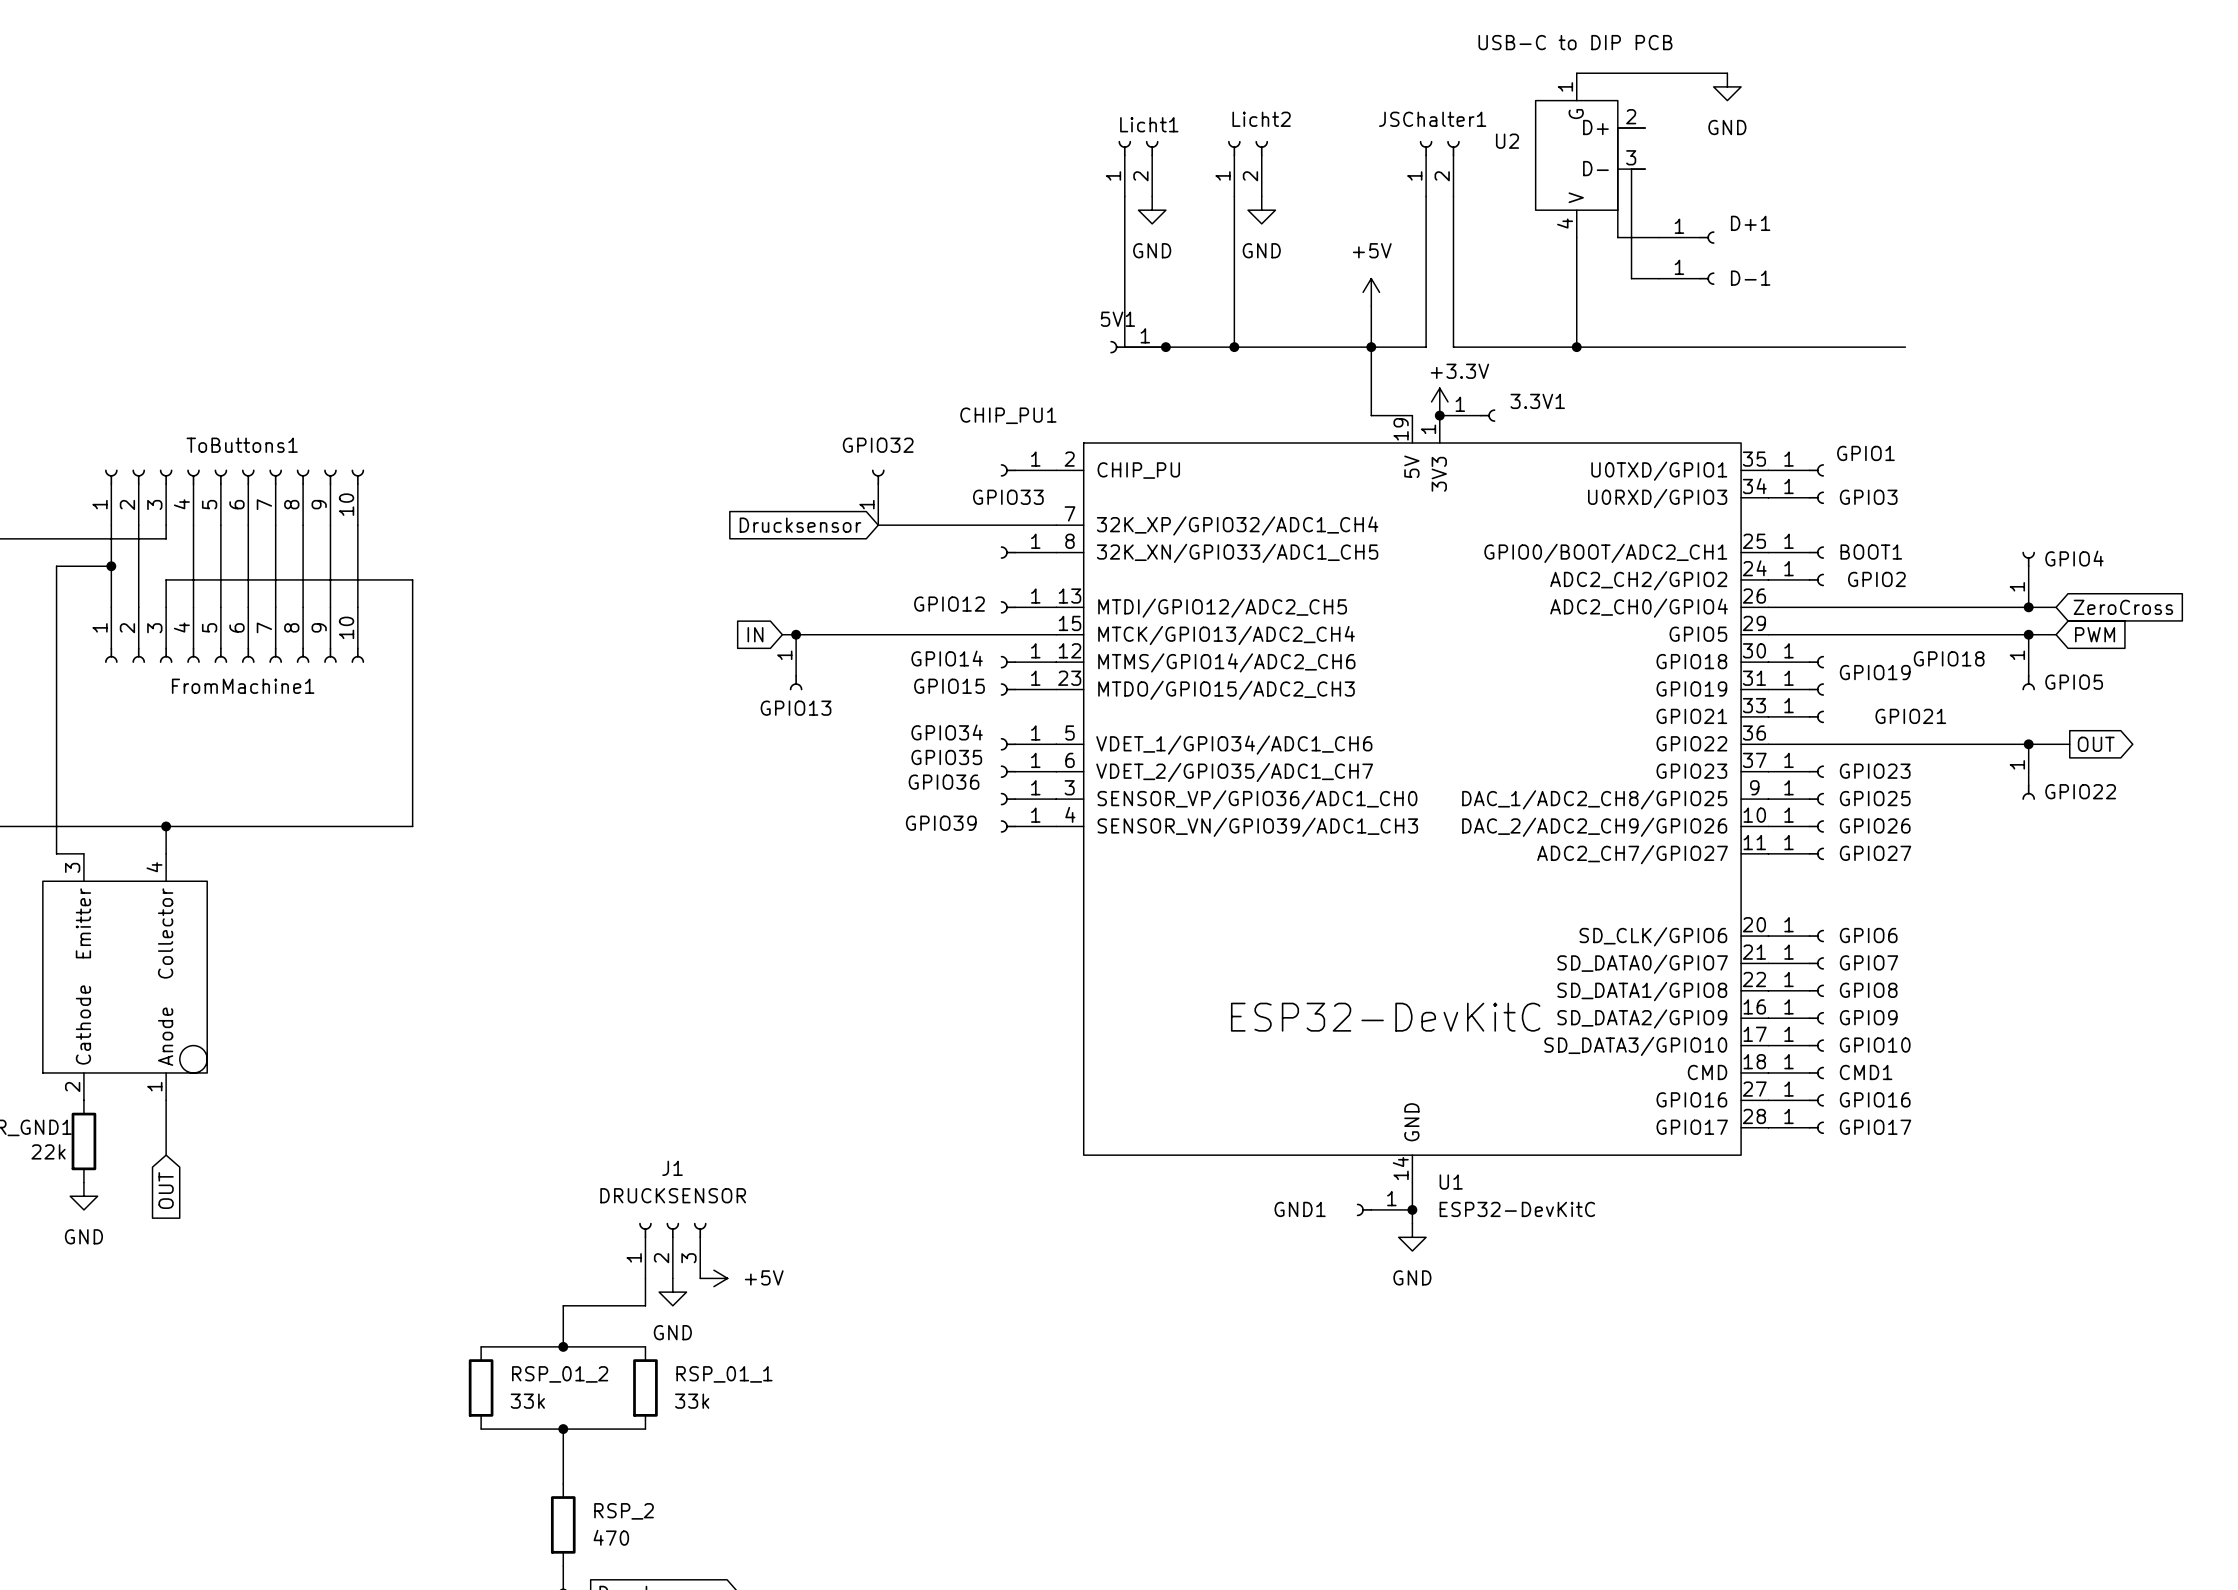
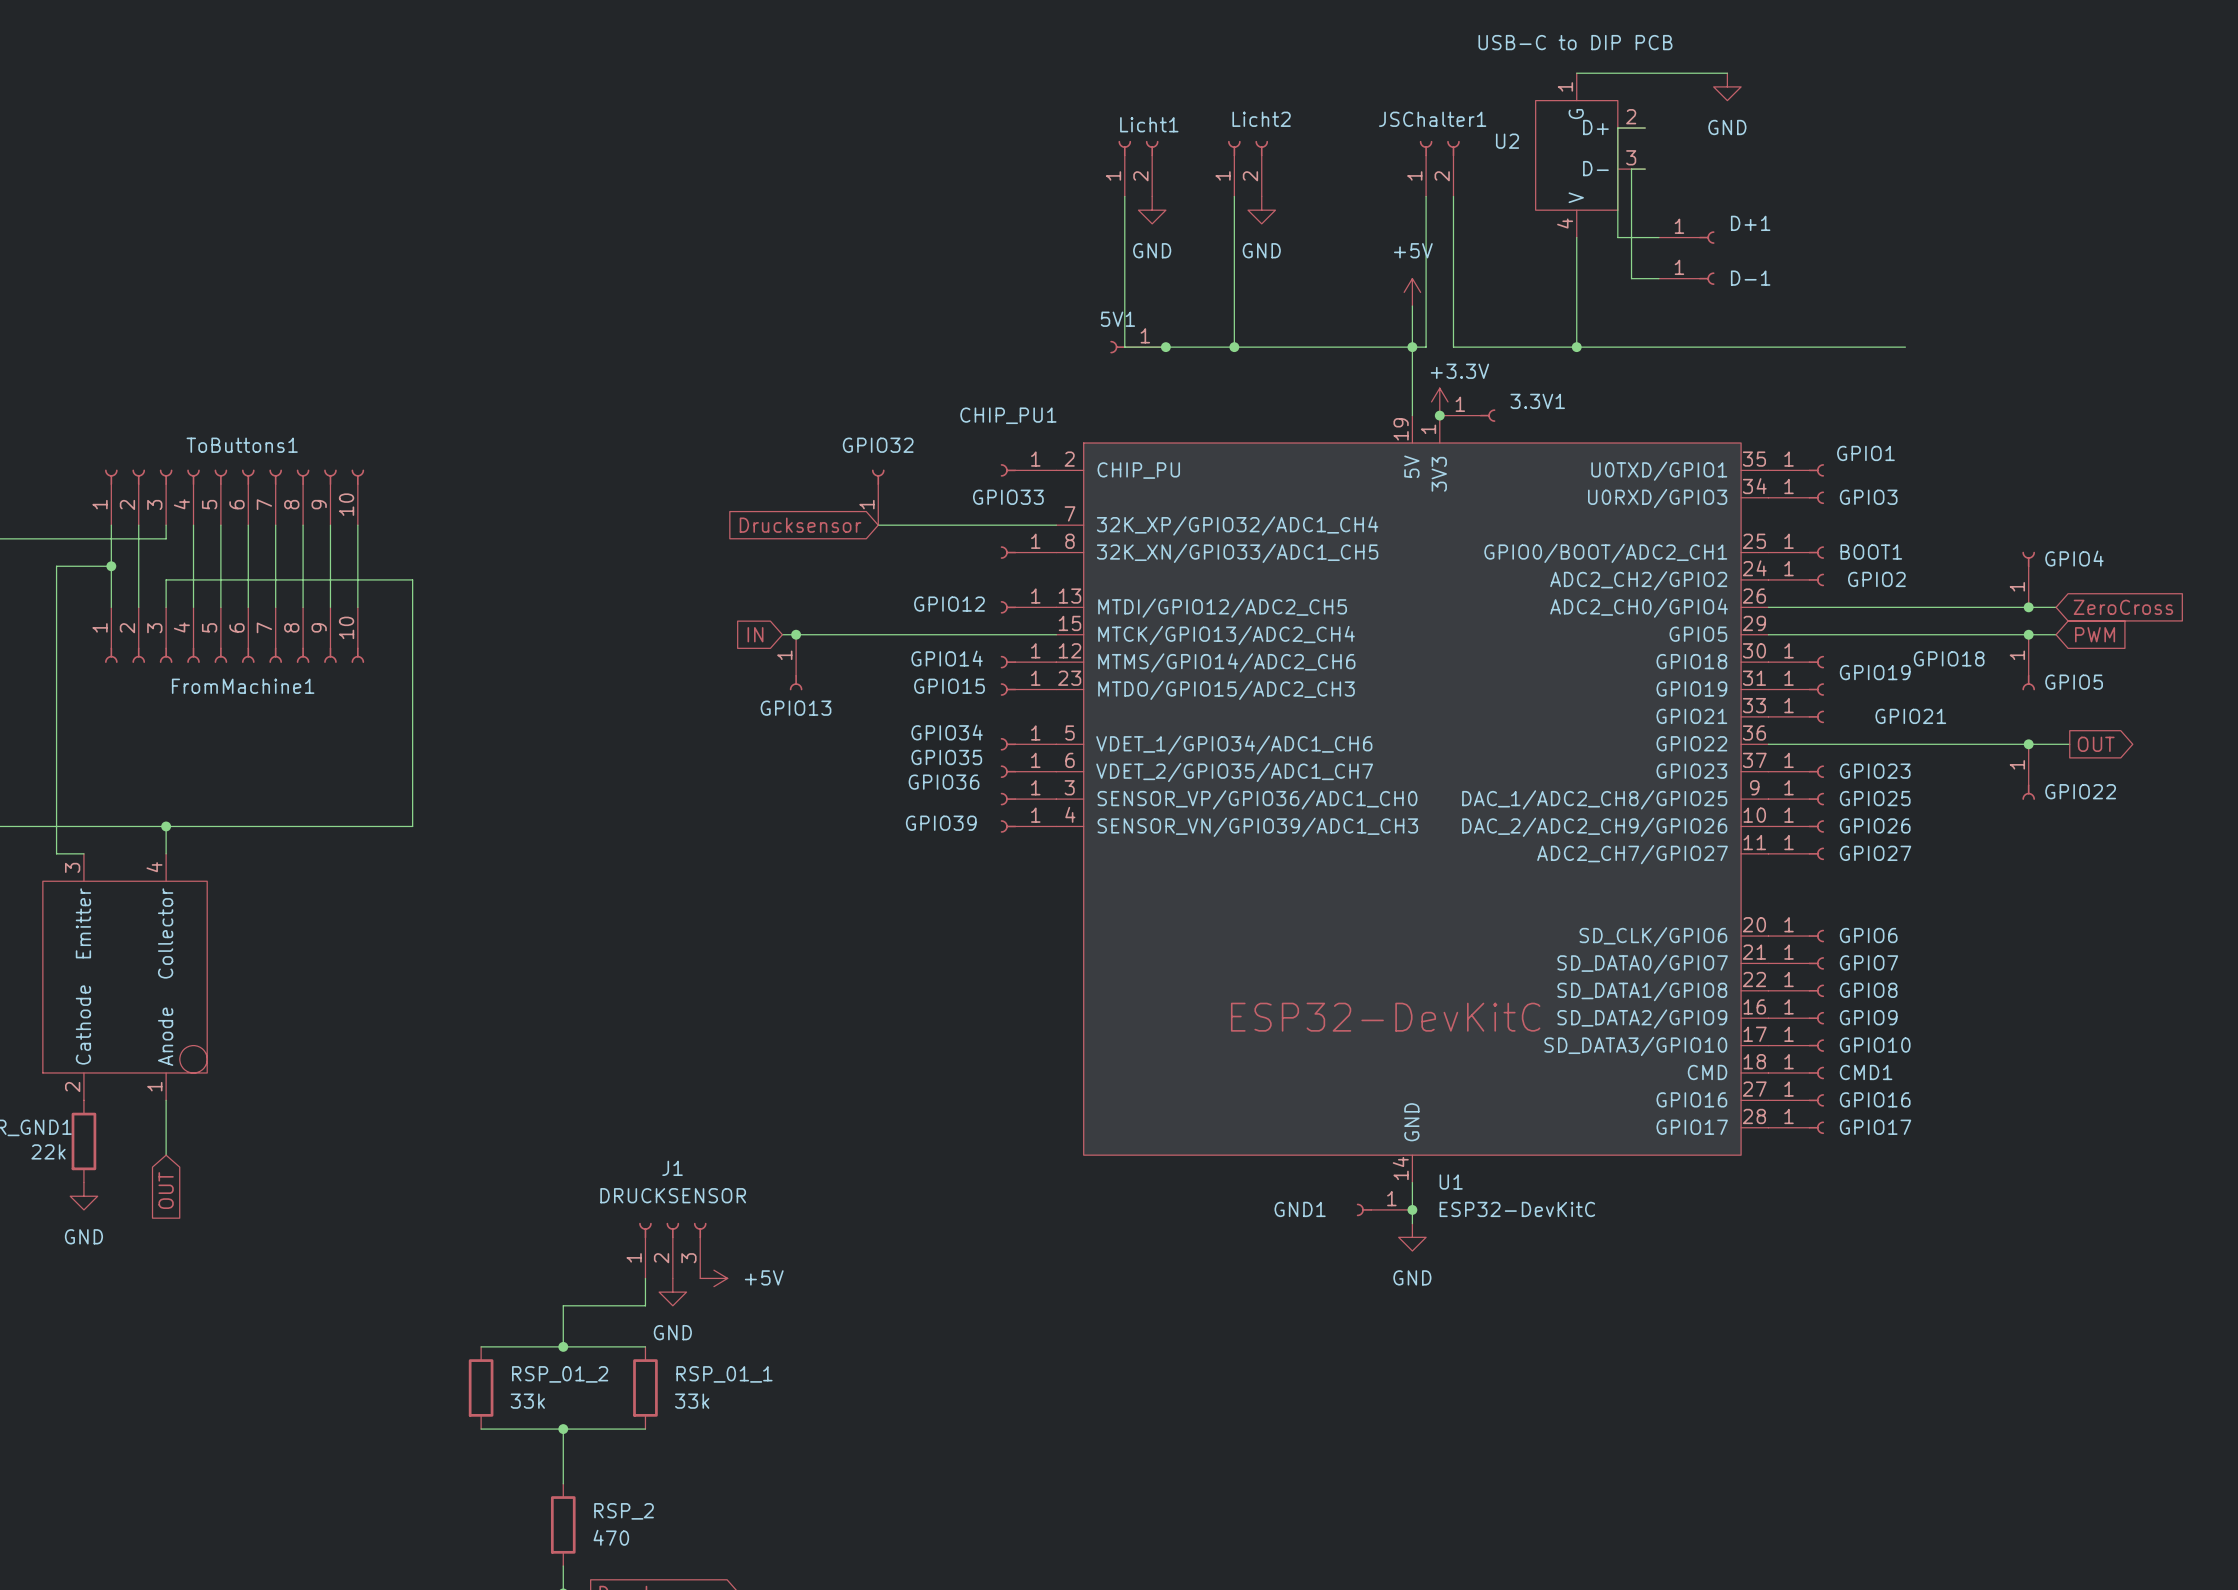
power symbol position: +5V (1371, 292) -> +5V (1412, 292)
wire: (1371, 306) (1371, 415) (1412, 415) -> (1412, 306) (1412, 415)
junction position: (1371, 347) -> (1412, 347)

